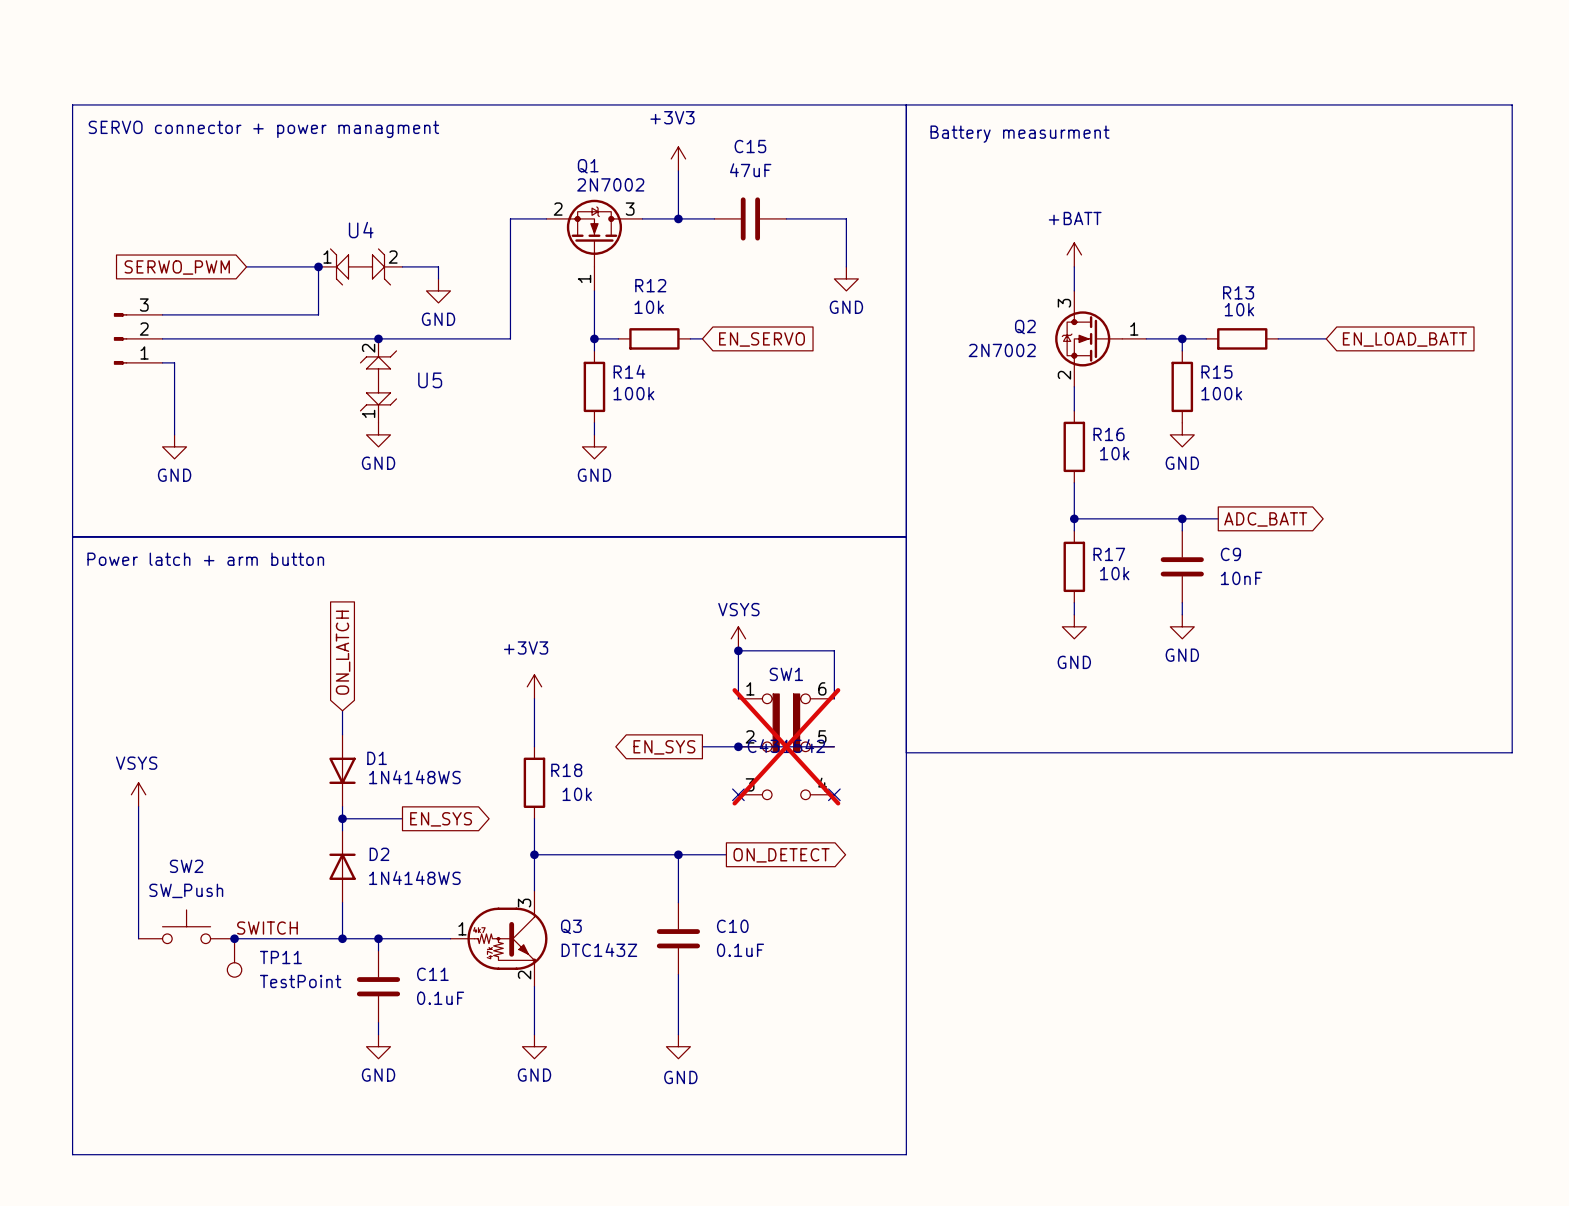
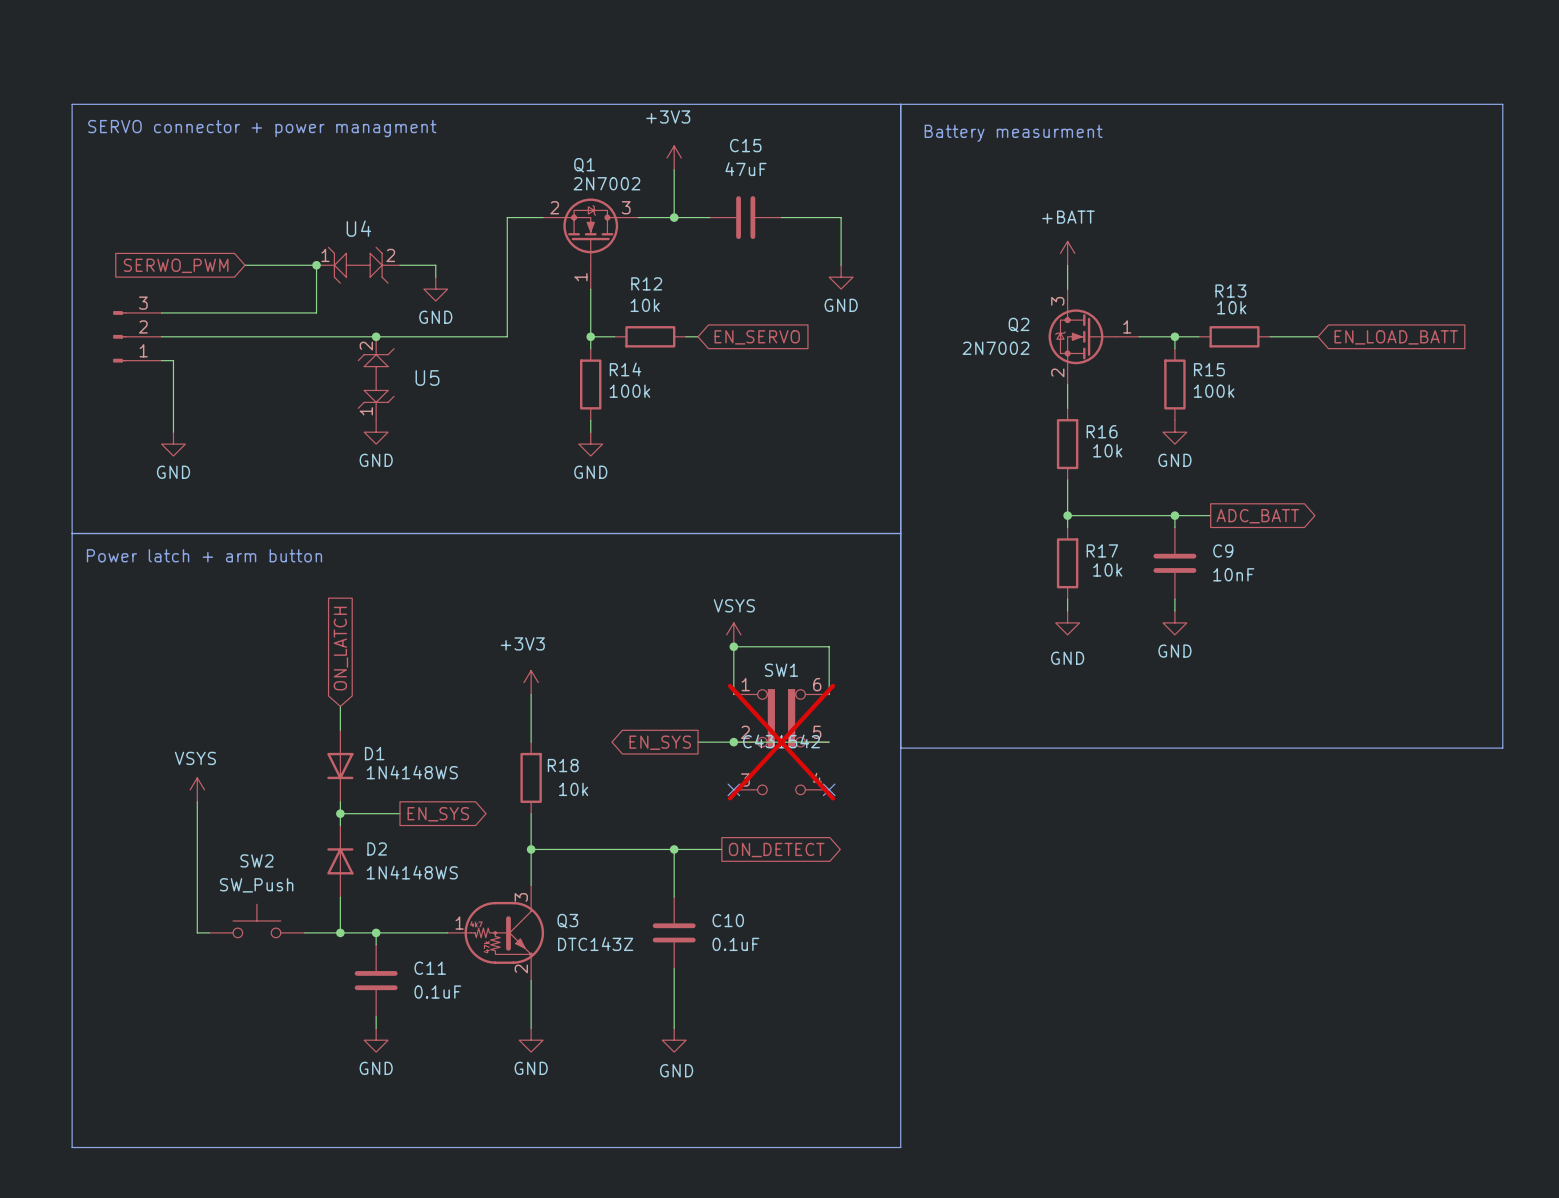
power symbol position: VSYS (138, 794) -> VSYS (197, 789)
wire: (138, 806) (138, 938) -> none
wire: none -> (197, 801) (197, 932) (209, 932)
SW2 position: (186, 926) -> (256, 920)
label: SWITCH (267, 928) -> none
wire: (234, 938) (306, 938) -> none
junction: (234, 938) -> none
TP11: TestPoint (234, 957) -> none

